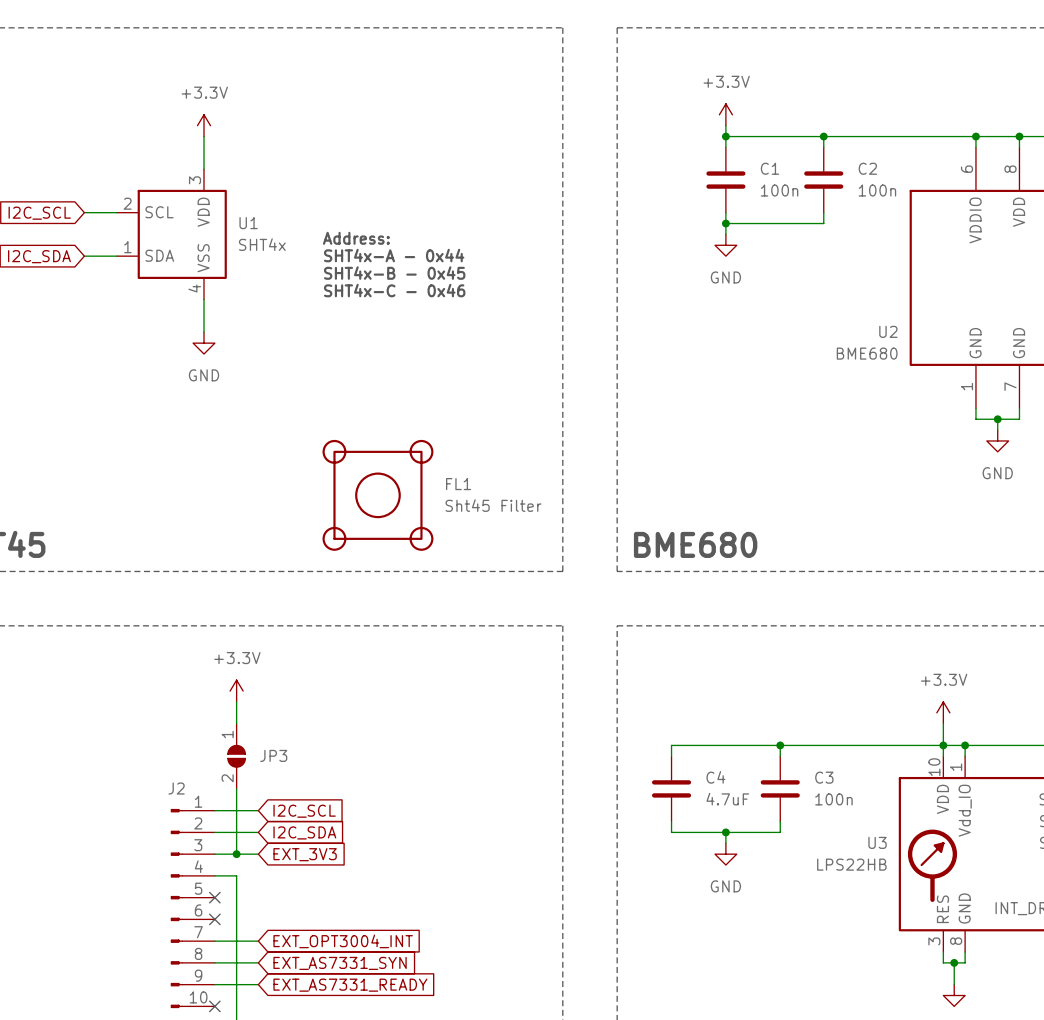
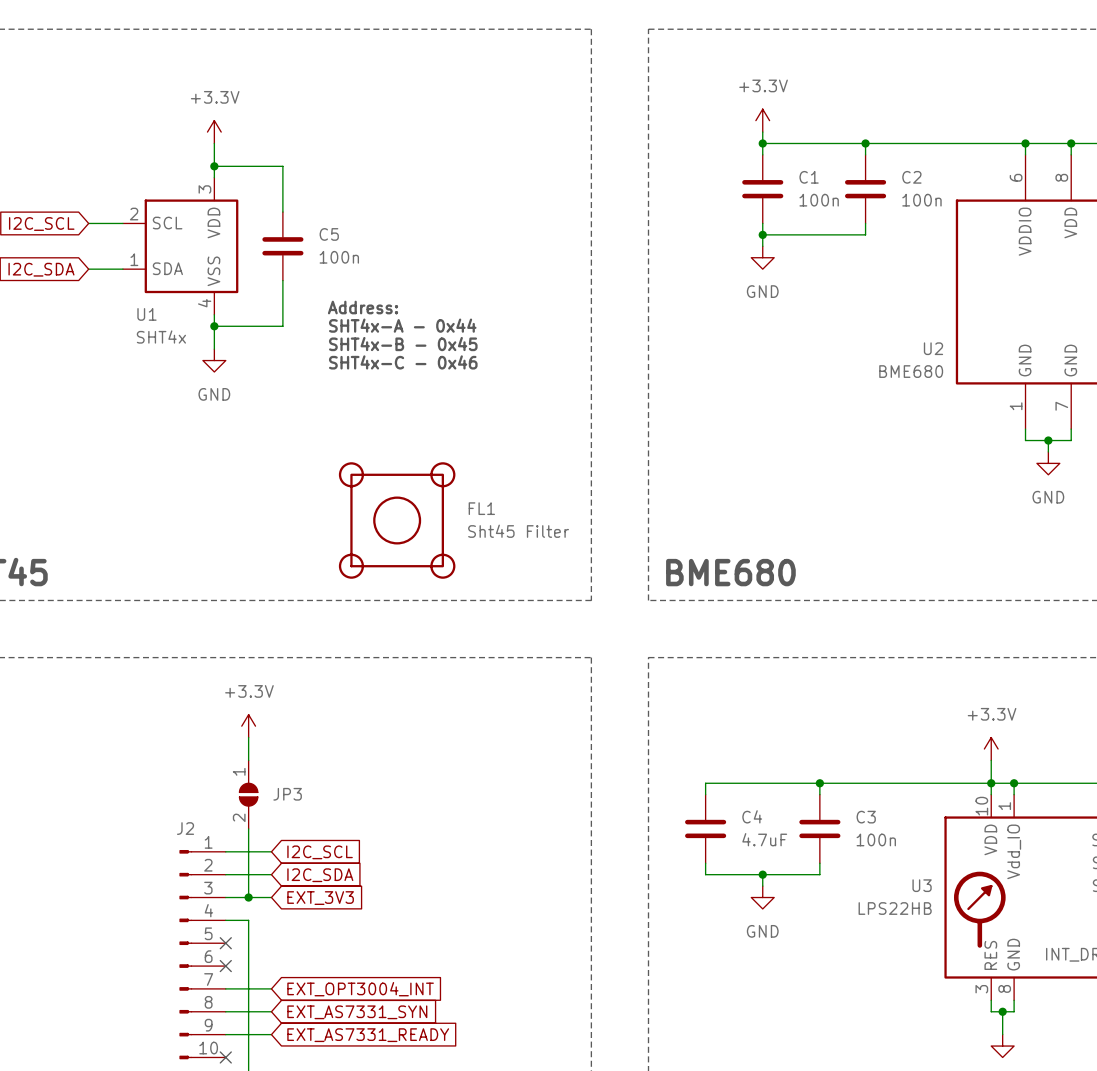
wire: none -> (214, 166) (282, 166) (282, 212)
junction: none -> (214, 166)
U1 name position: U1 (248, 223) -> U1 (146, 314)
C5: none -> 100n (282, 246)
text position: Address: (356, 238) -> Address: (363, 307)
U1 value position: SHT4x (262, 244) -> SHT4x (161, 337)
text position: SHT4x-A - 0x44 (394, 255) -> SHT4x-A - 0x44 (402, 325)
wire: none -> (282, 280) (282, 326) (214, 326)
text position: SHT4x-B - 0x45 (394, 273) -> SHT4x-B - 0x45 (403, 344)
text position: SHT4x-C - 0x46 (394, 290) -> SHT4x-C - 0x46 (403, 362)
junction: none -> (214, 326)

